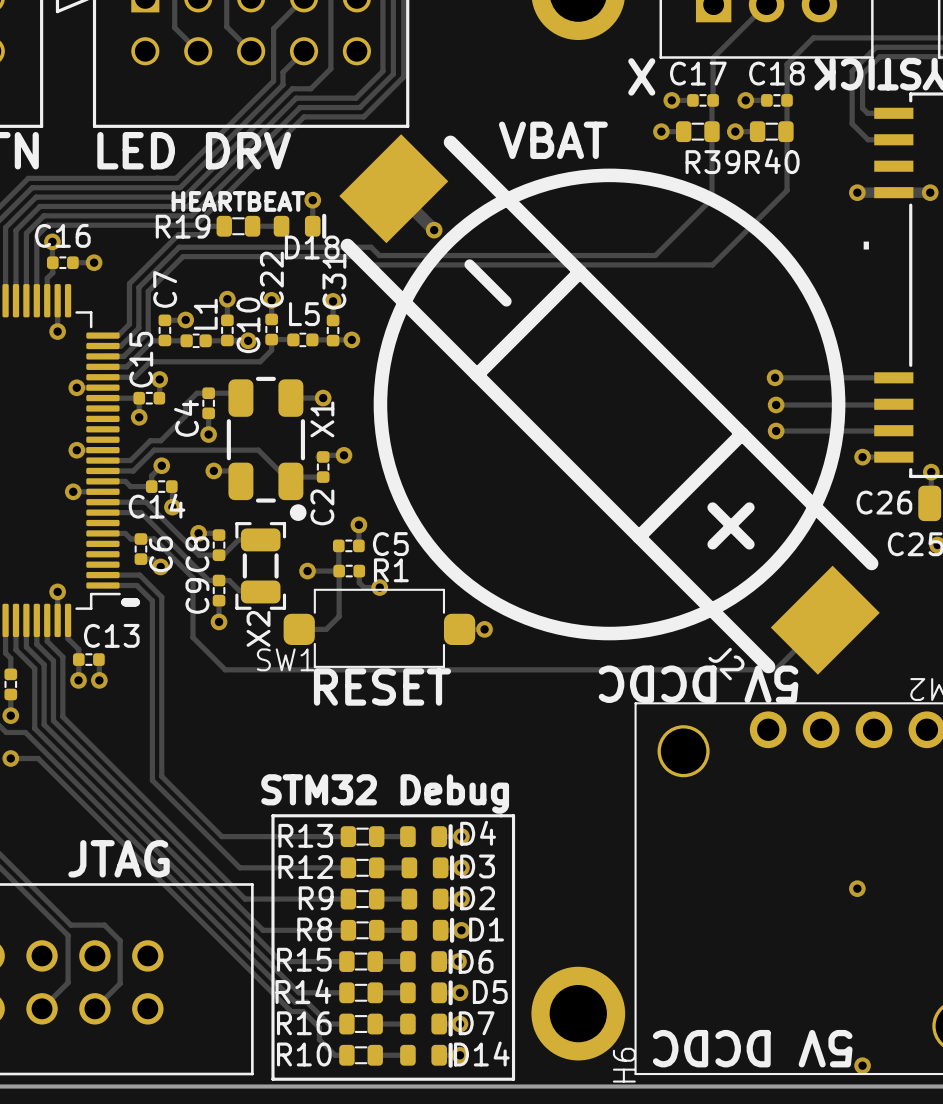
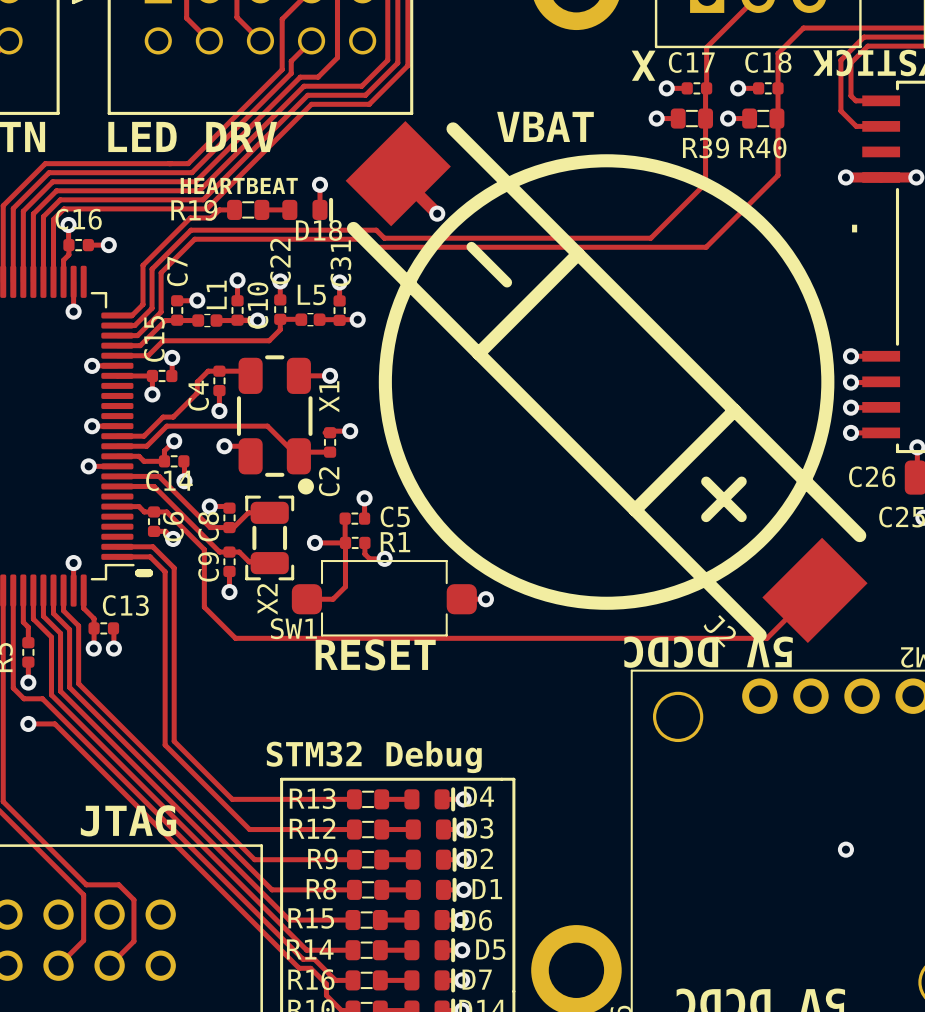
track: (775, 377) (862, 377) -> none
via: (775, 377) -> none
via: none -> (850, 356)
track: (776, 404) (862, 404) -> none
via: (776, 404) -> none
via: none -> (850, 382)
track: (776, 431) (862, 431) -> none
via: (776, 431) -> none
via: none -> (850, 407)

